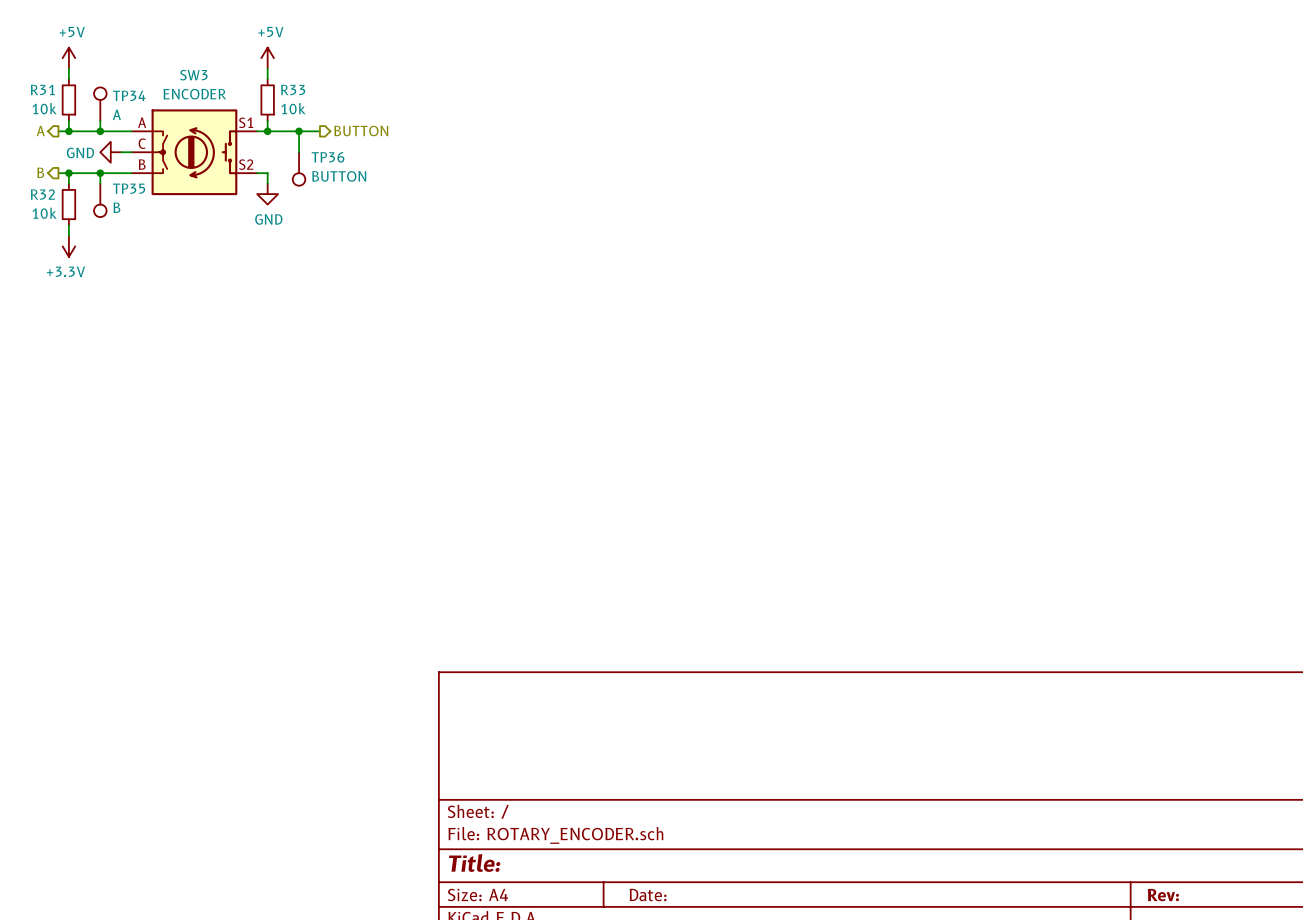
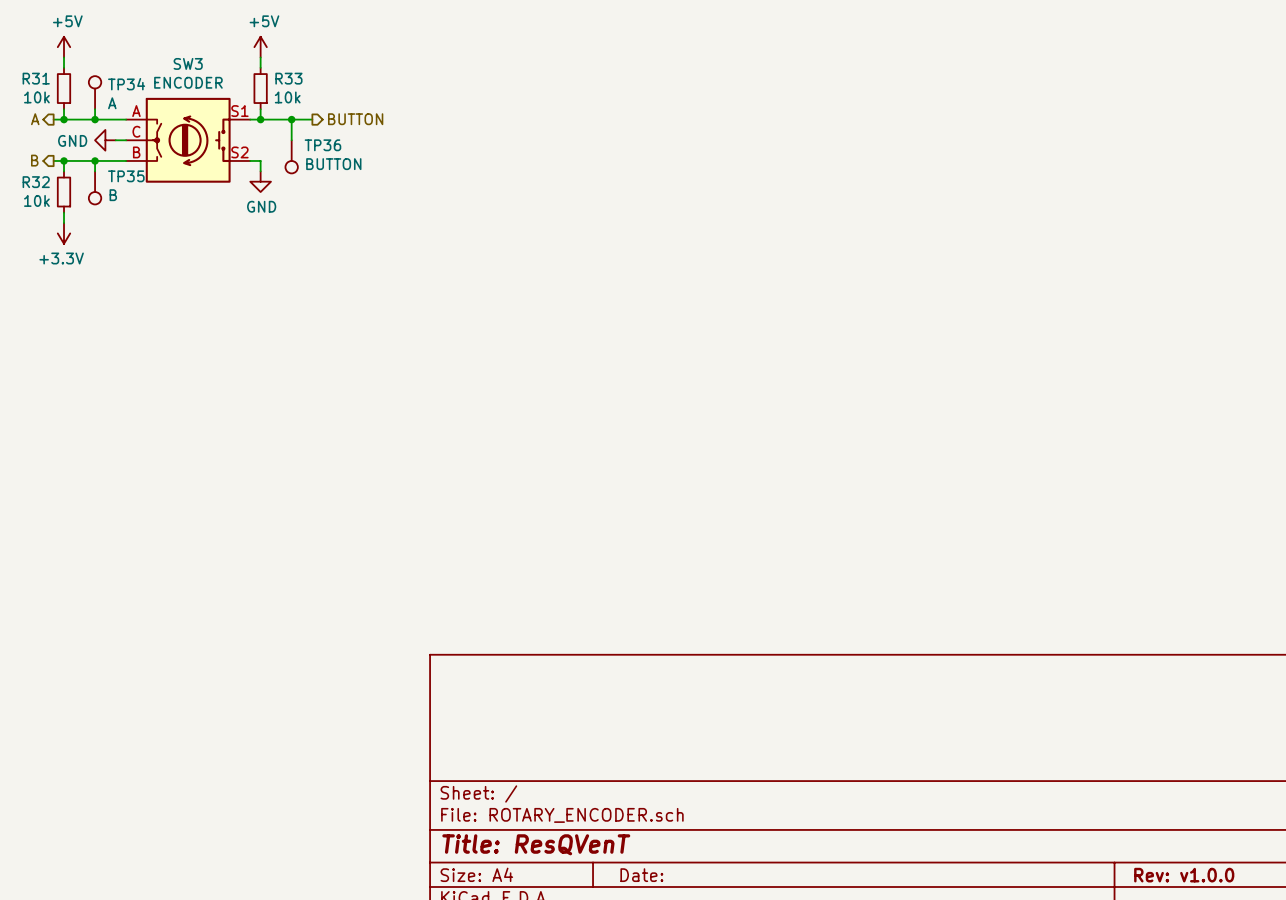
title block: Title: (474, 863) -> Title: ResQVenT (536, 844)
title block: Rev: (1163, 895) -> Rev: v1.0.0 (1184, 875)

